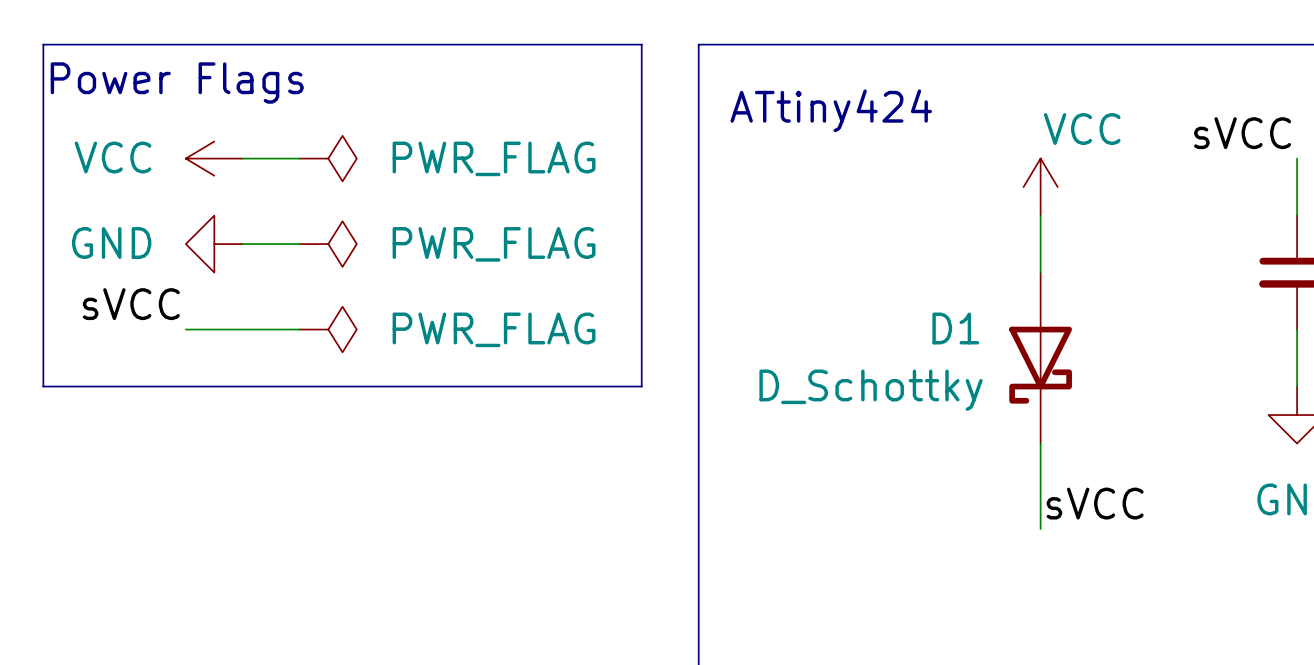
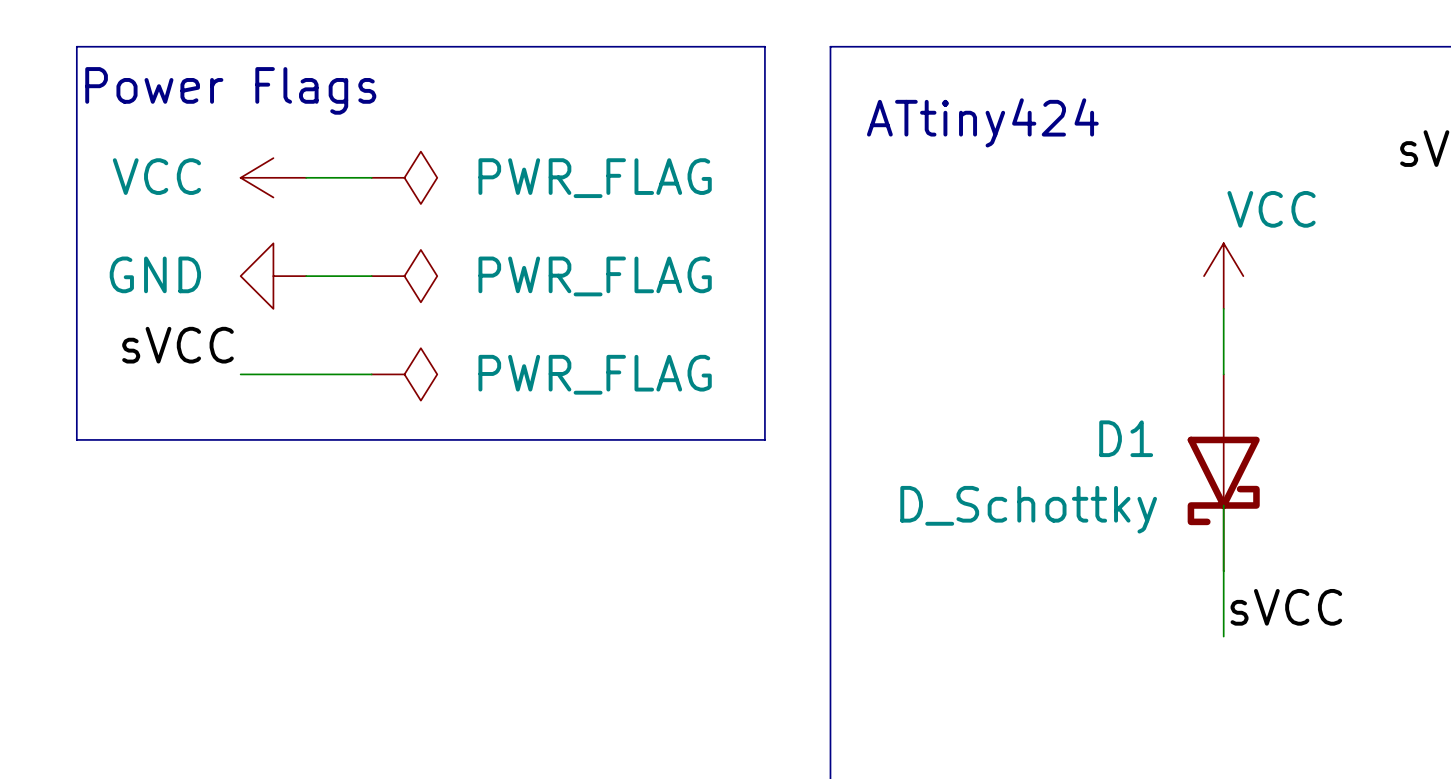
power symbol position: VCC (1040, 187) -> VCC (1223, 276)
D1 position: (1040, 358) -> (1223, 472)
label position: sVCC (1095, 503) -> sVCC (1286, 607)
wire: none -> (1223, 603) (1223, 636)

